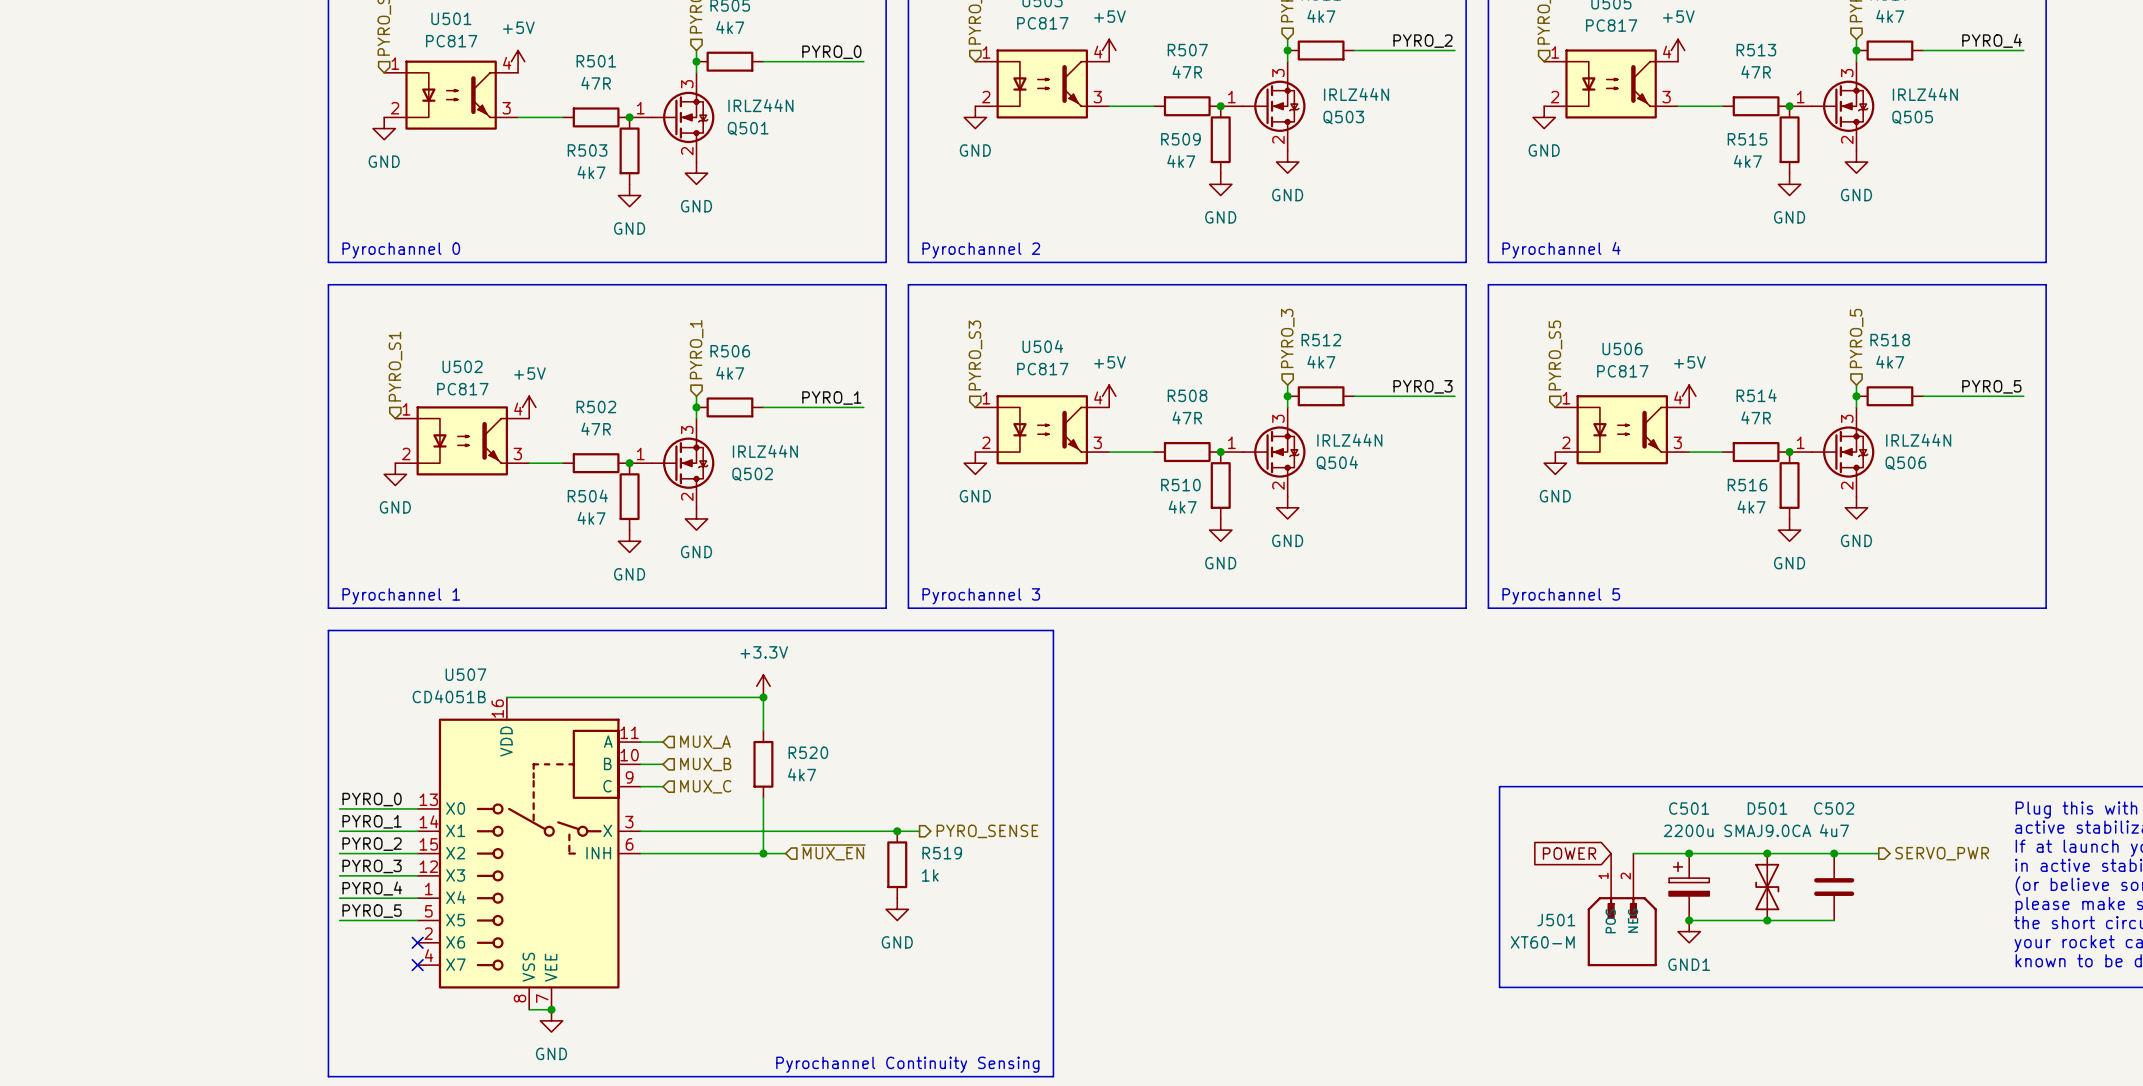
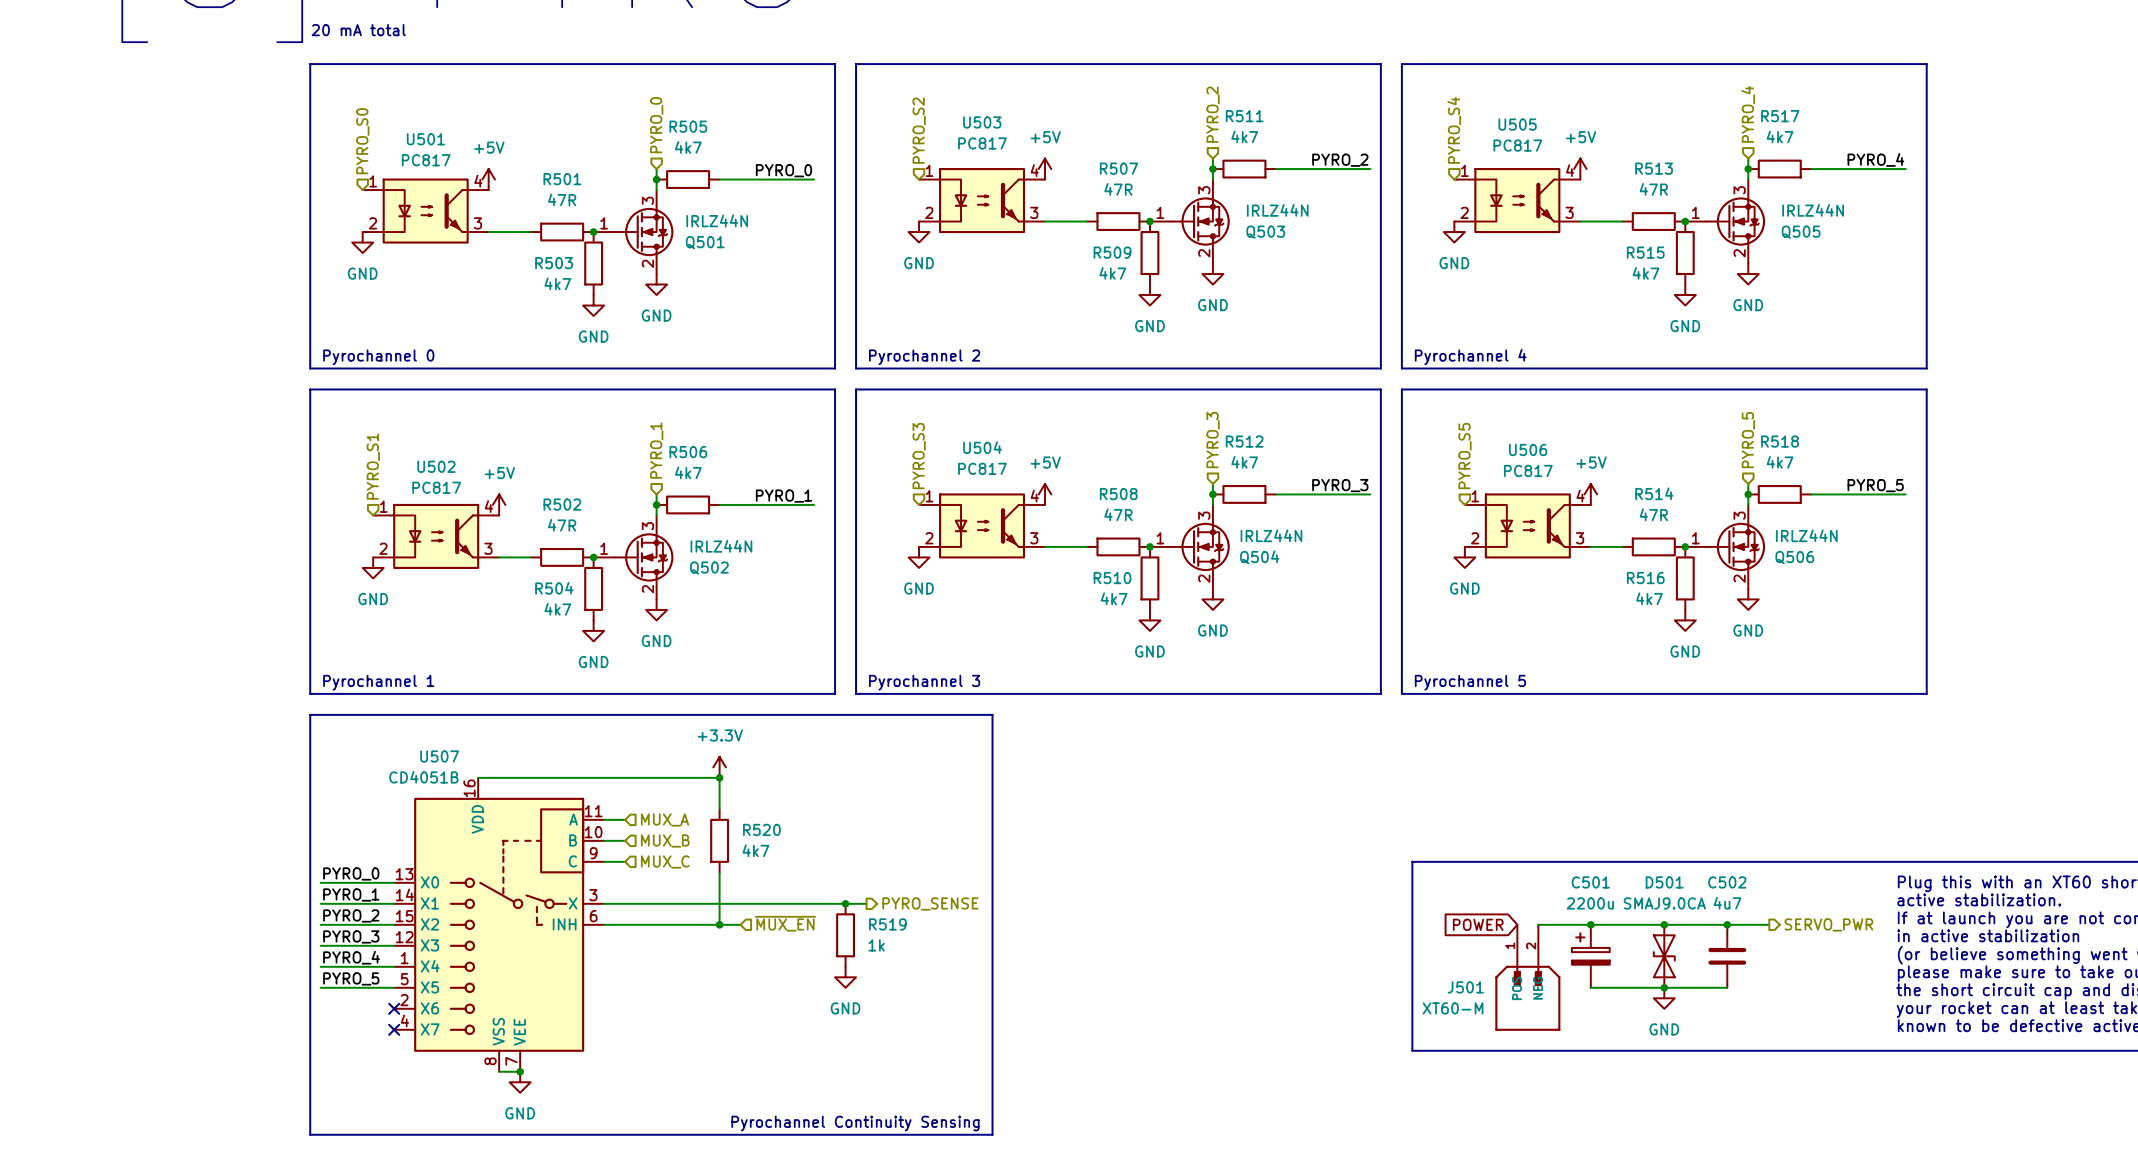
junction: (1689, 920) -> none
power symbol: GND1 (1689, 931) -> none
power symbol: none -> GND (1664, 998)

